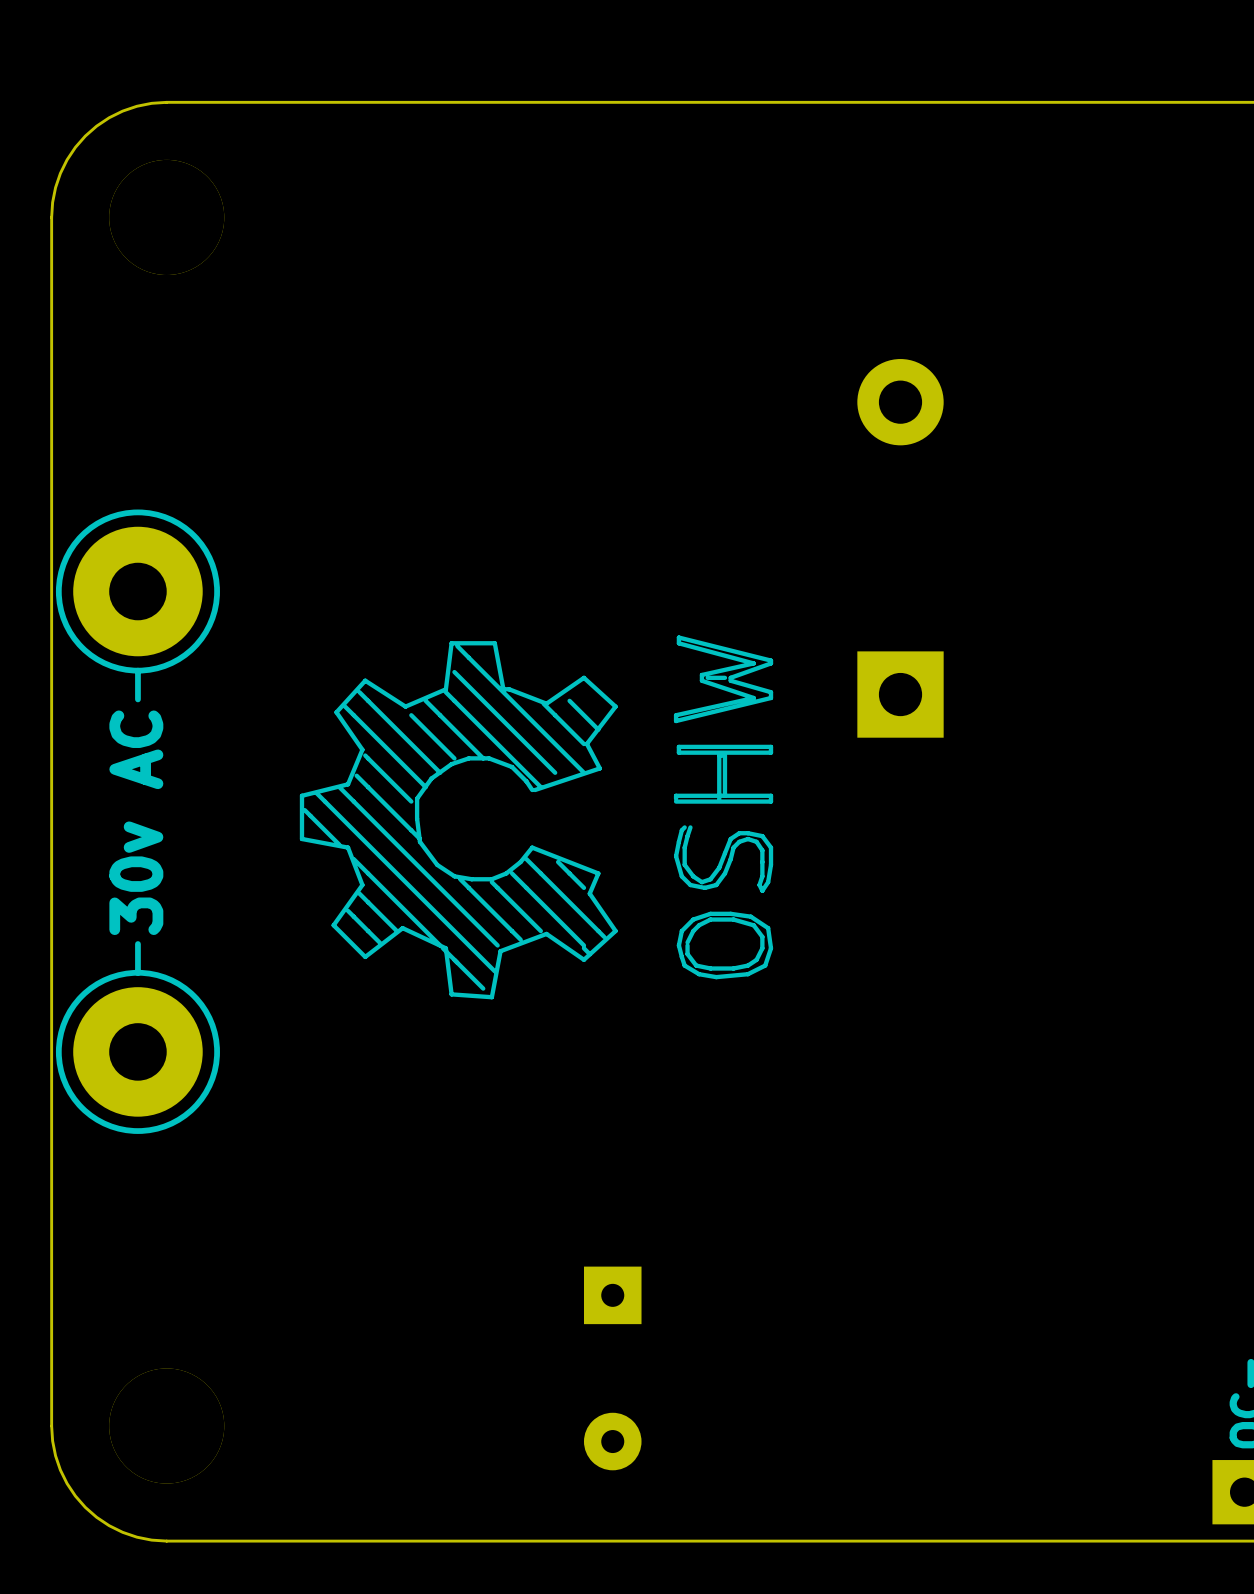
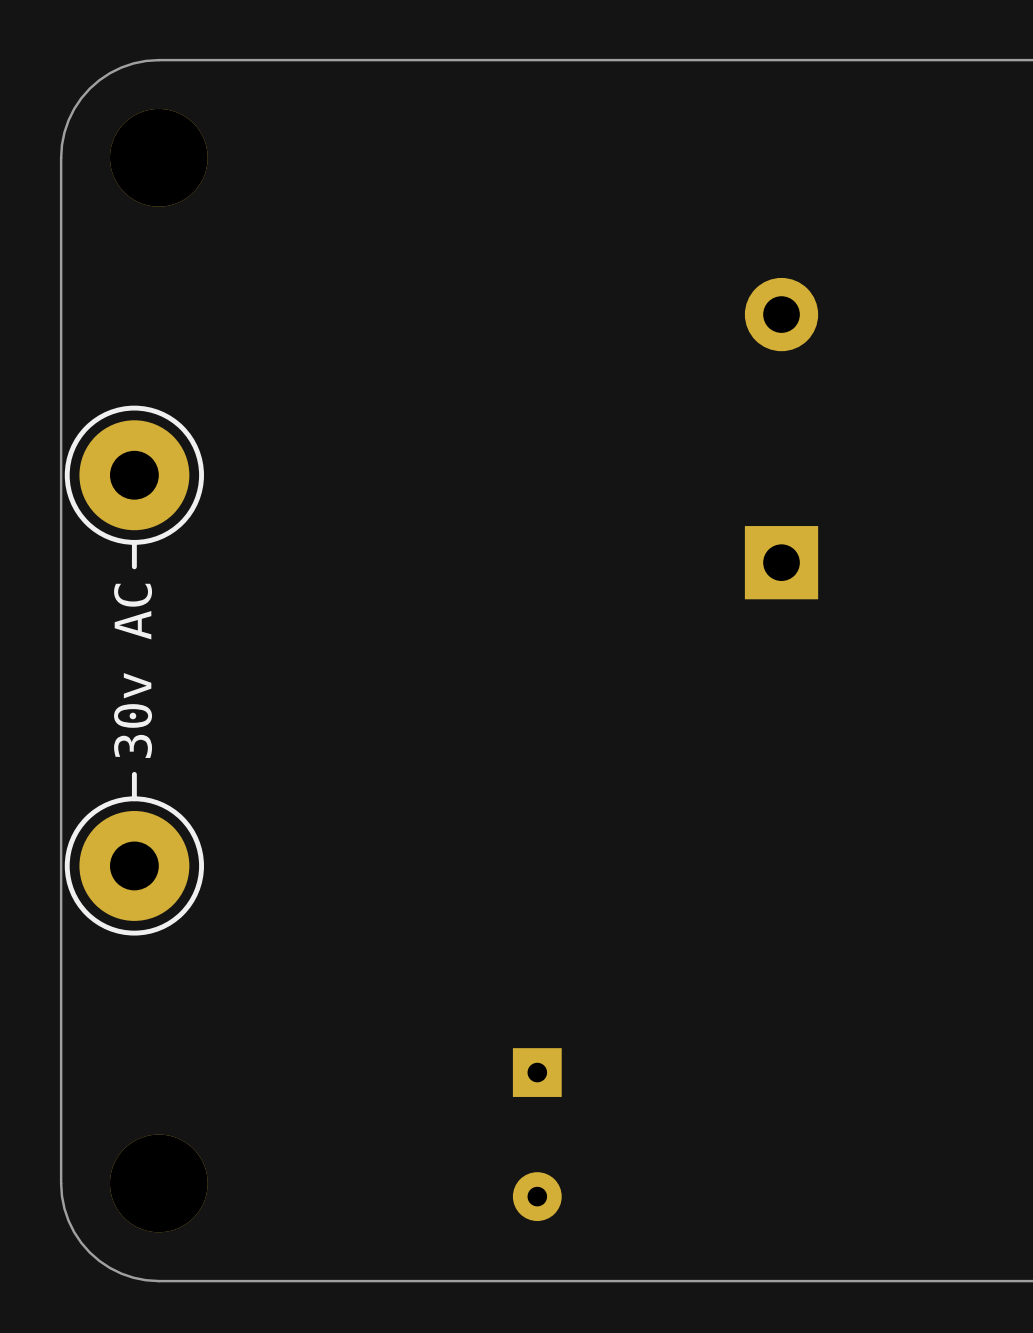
drawing: [299, 635, 774, 1000] -> none

